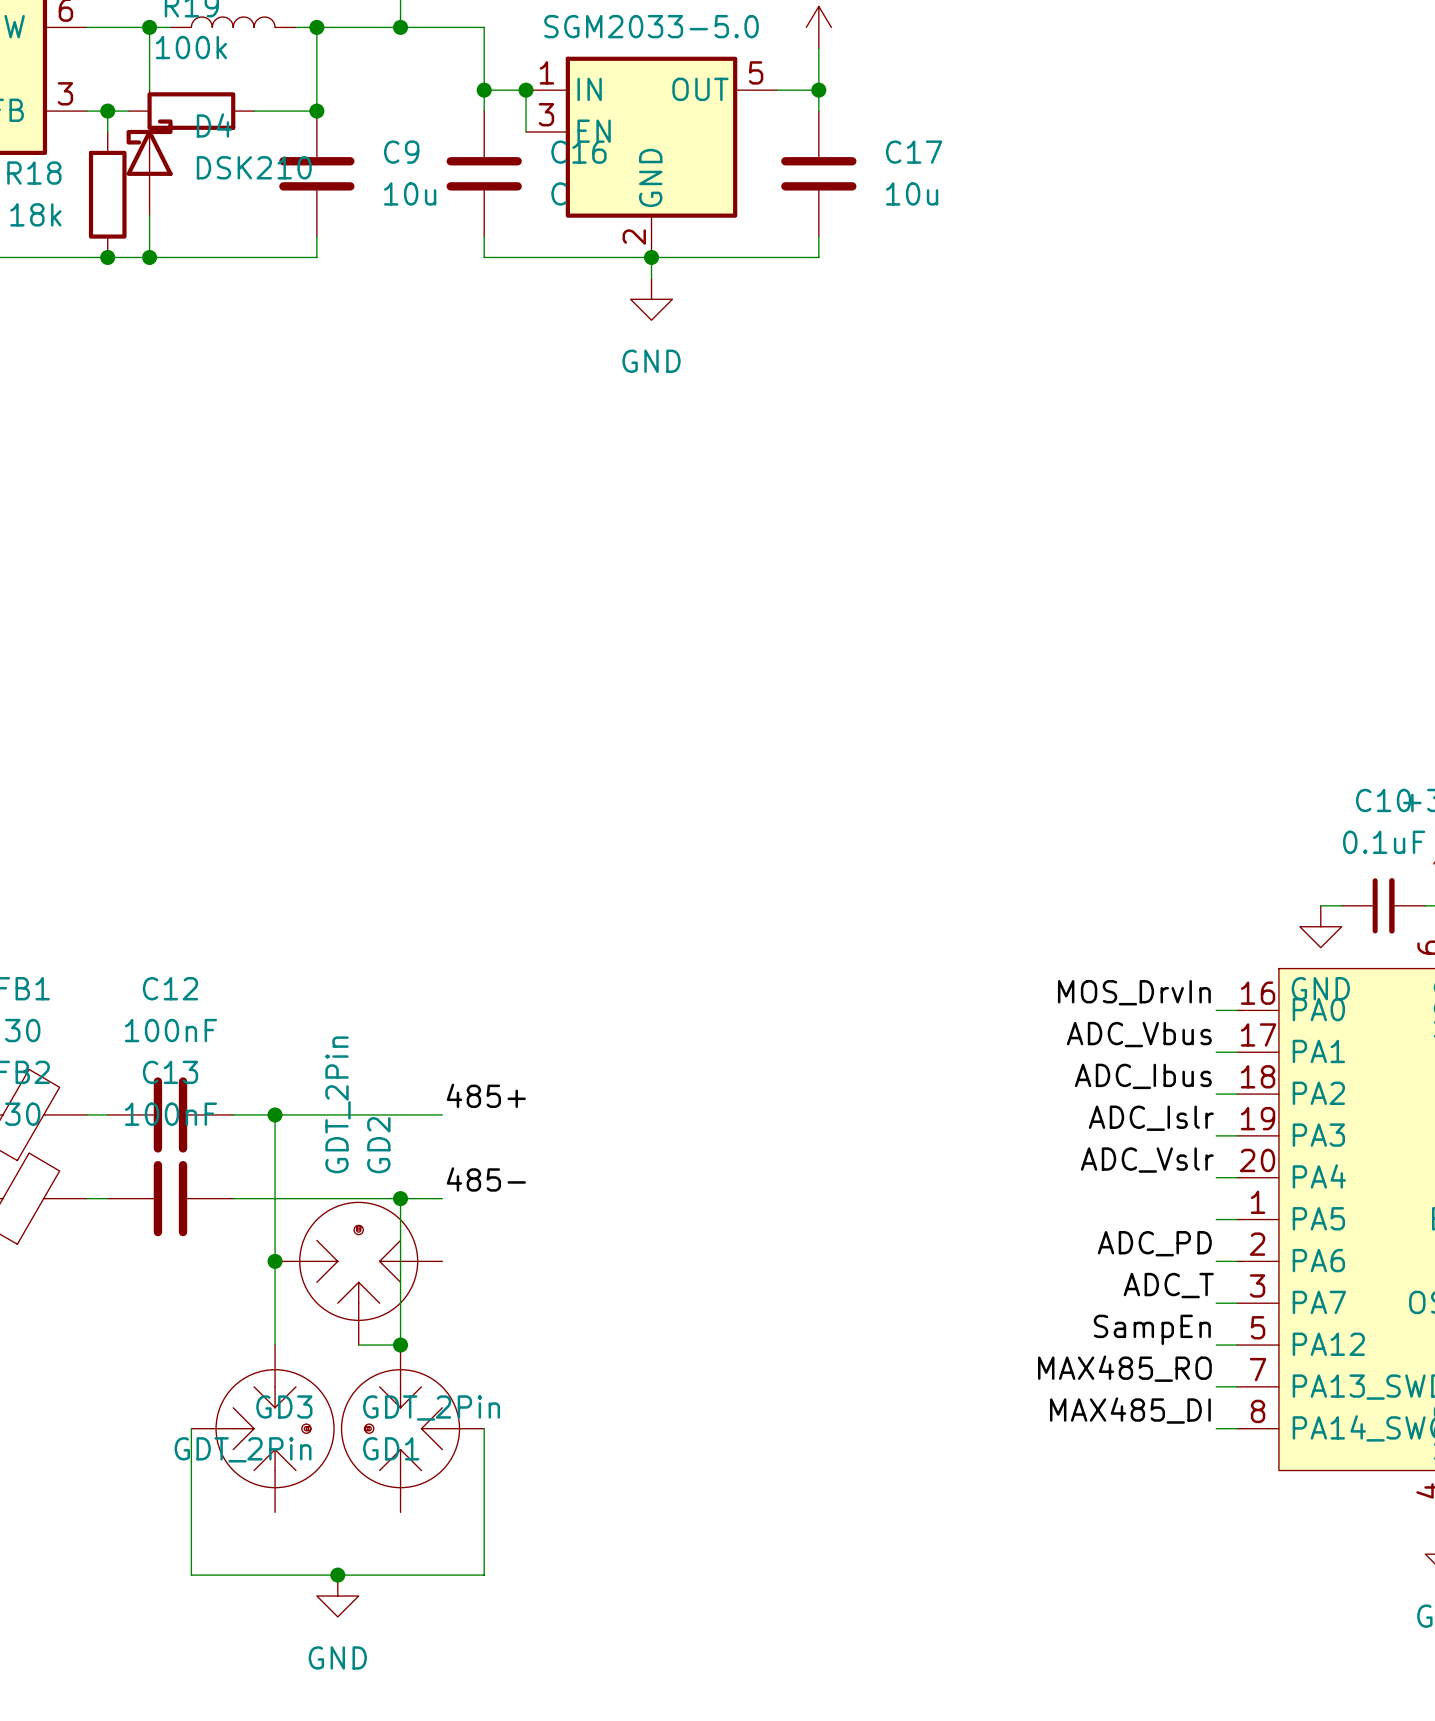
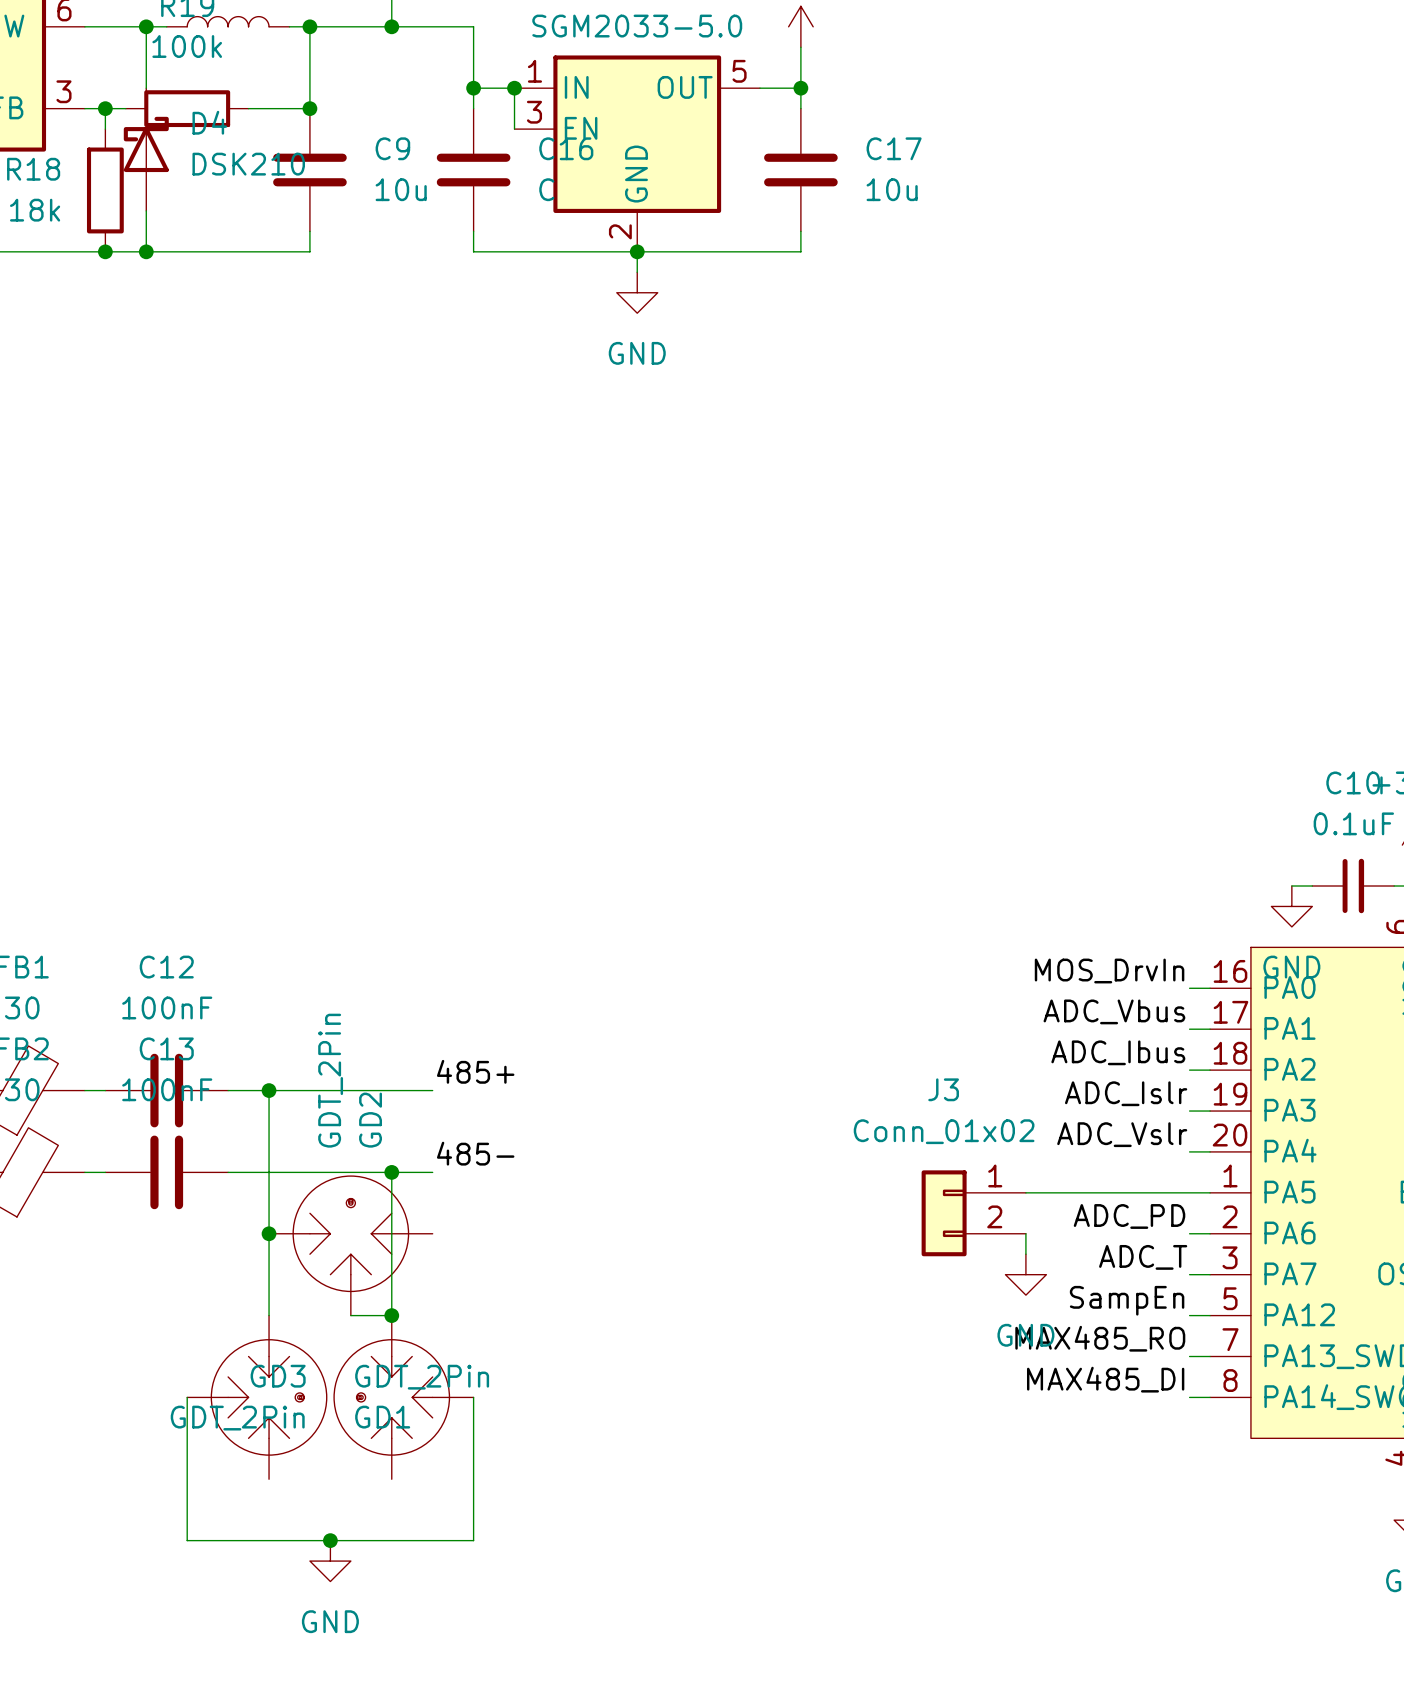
wire: none -> (1025, 1192) (1189, 1192)
J3: none -> Conn_01x02 (973, 1213)
wire: none -> (1025, 1233) (1025, 1254)
power symbol: none -> GND (1025, 1274)

